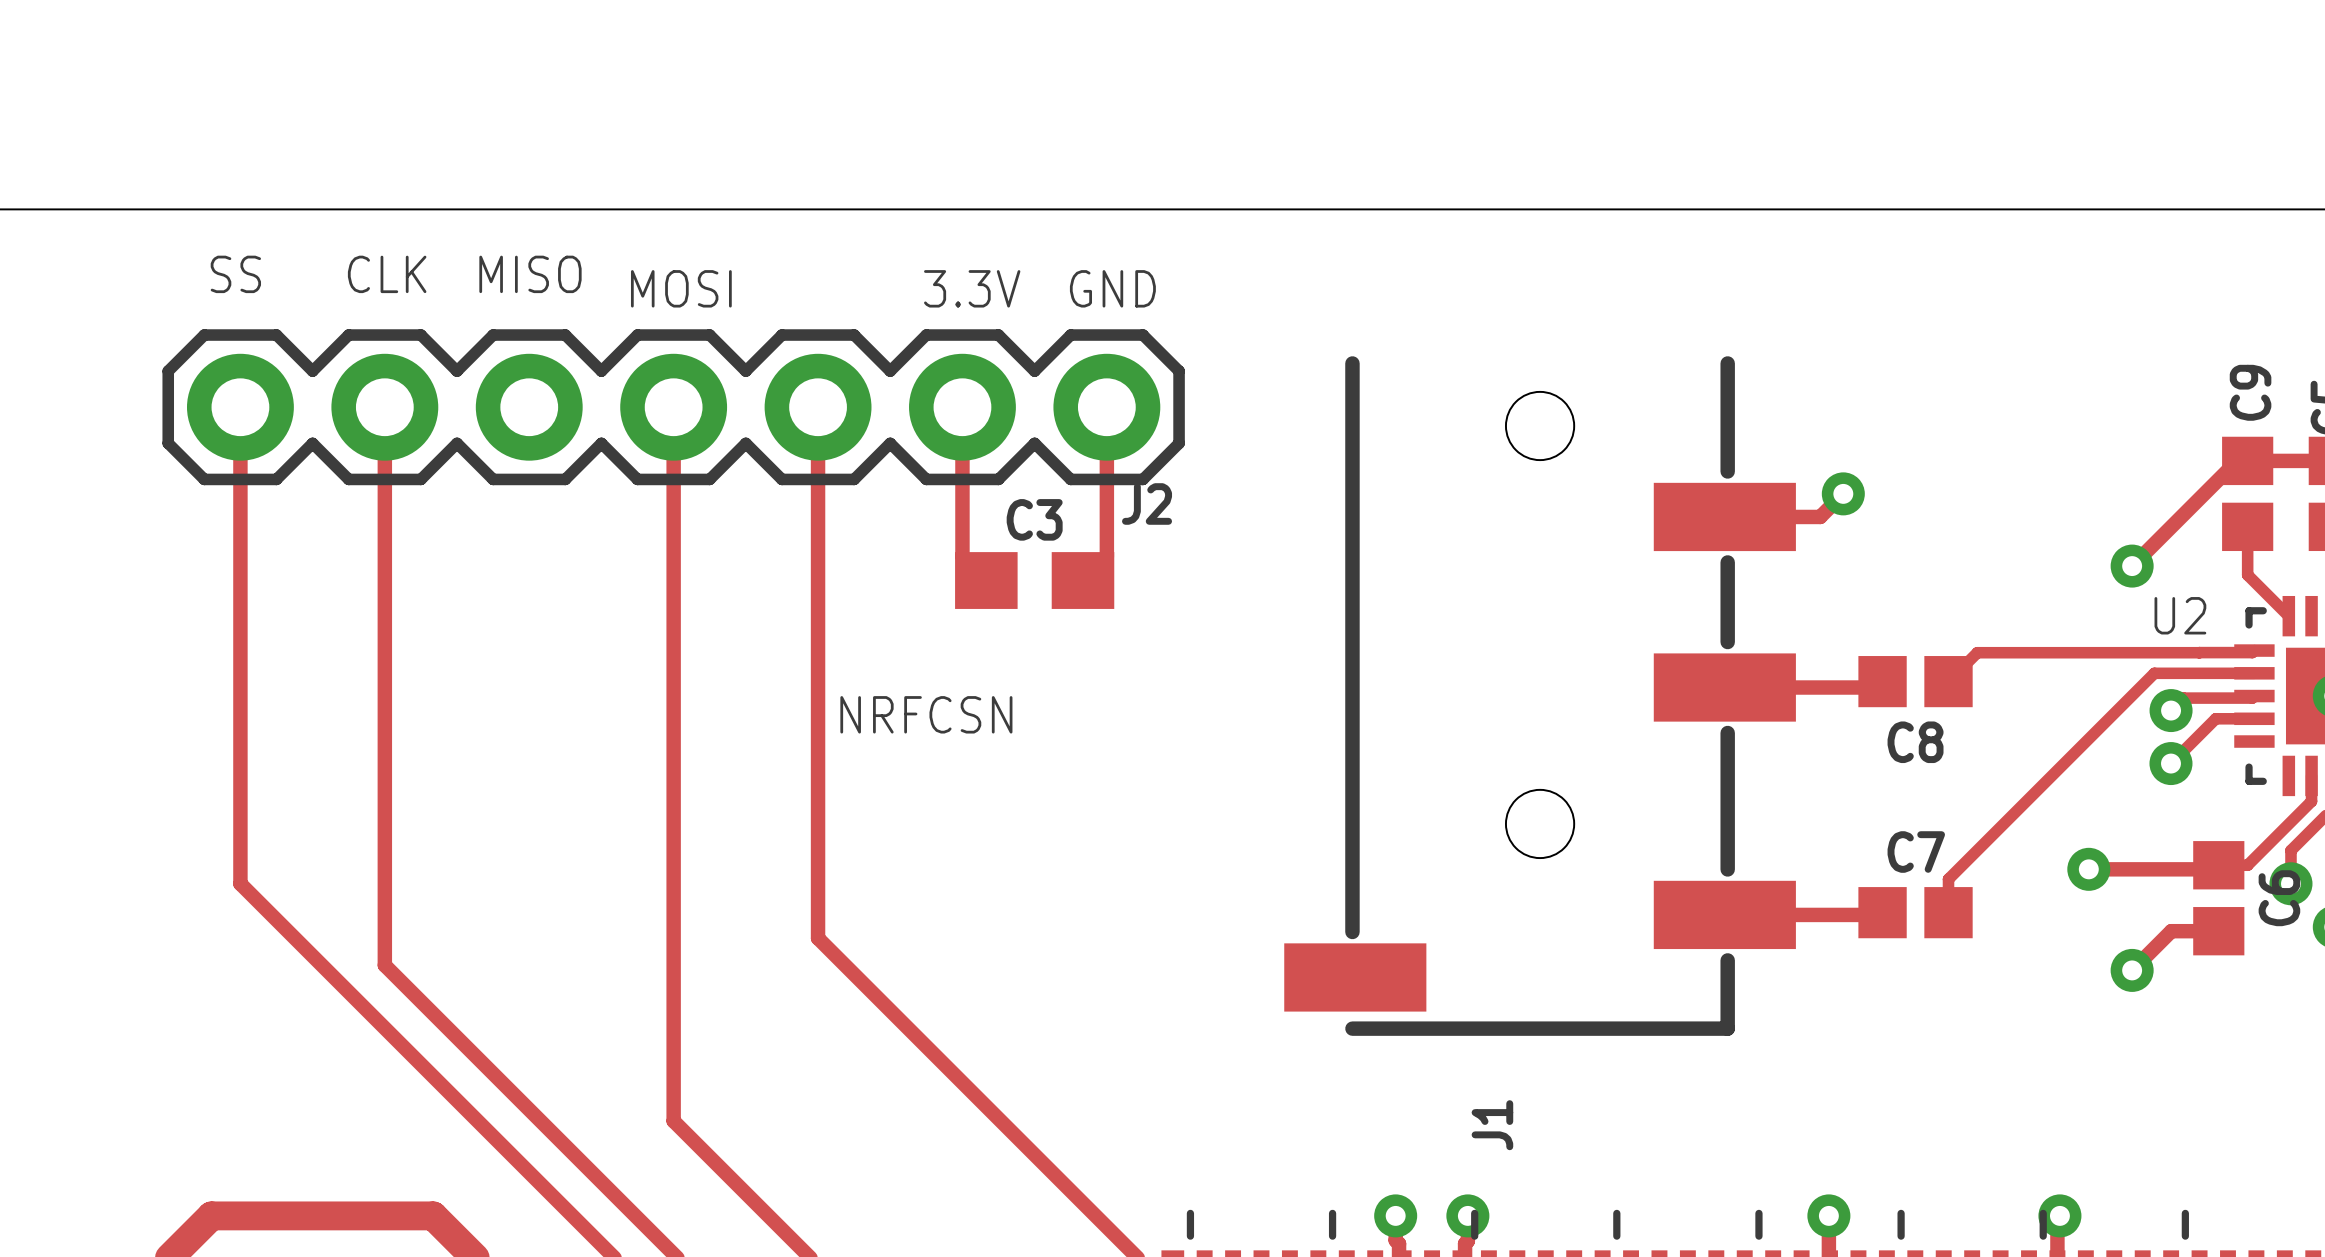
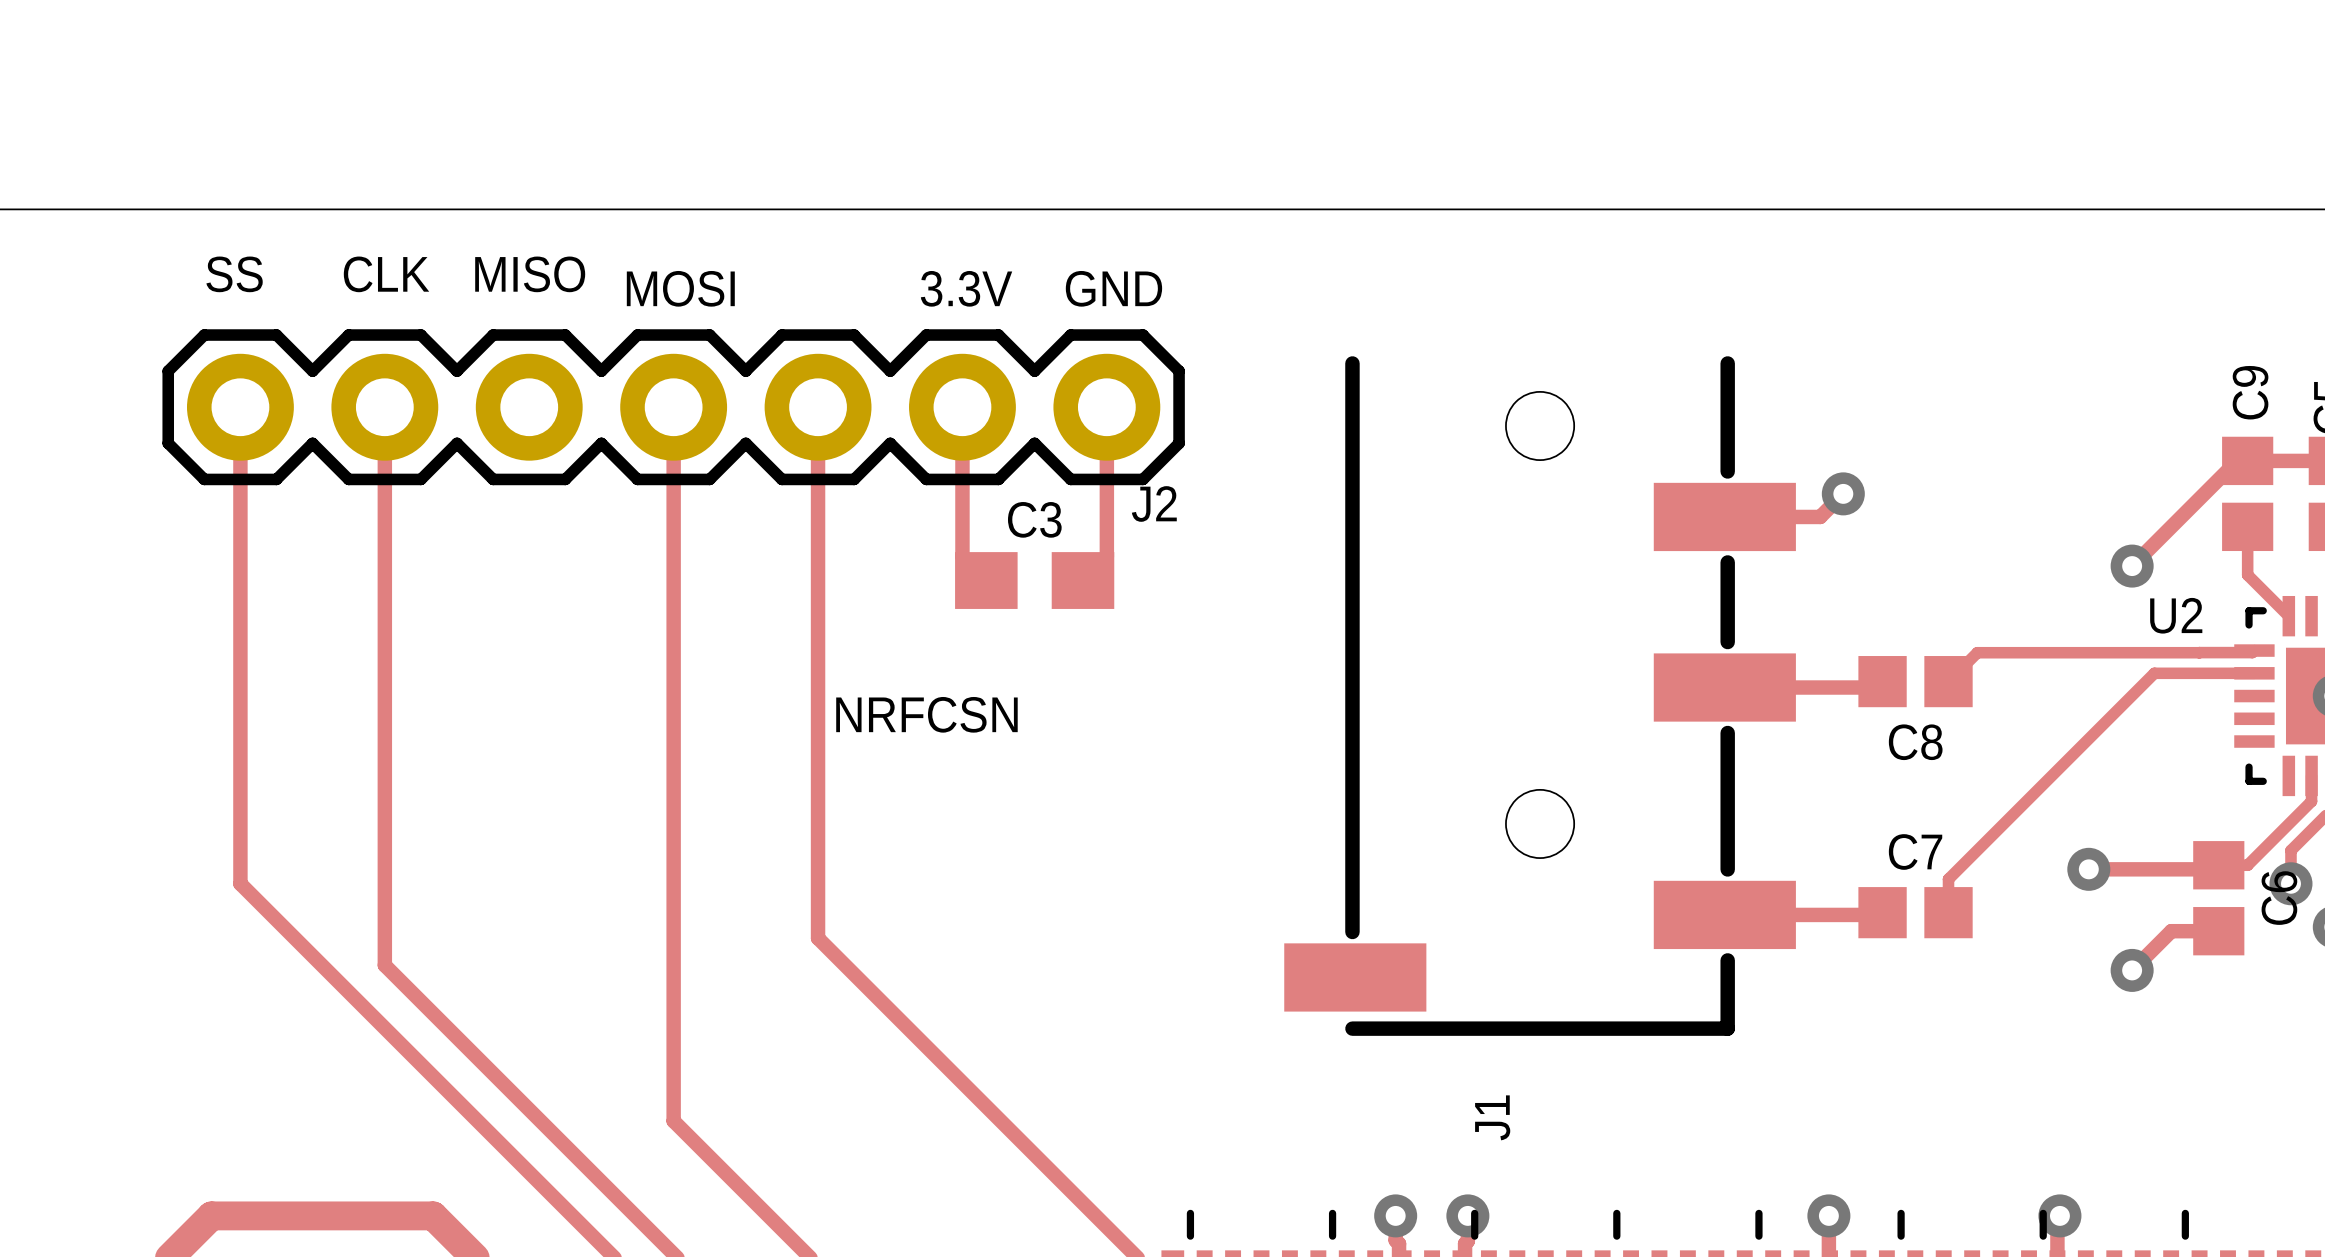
track: (2254, 696) (2252, 698) (2183, 698) (2171, 710) -> none
via: (2171, 710) -> none
track: (2254, 718) (2215, 718) (2170, 763) -> none
via: (2170, 763) -> none

